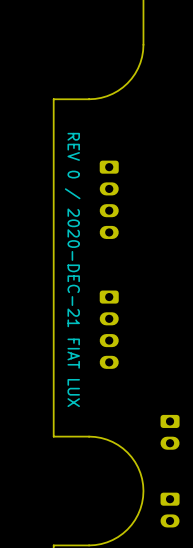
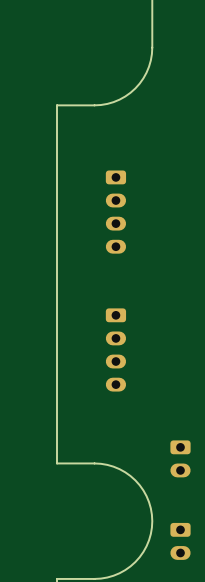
text: REV 0 / 2020-DEC-21 FIAT LUX (72, 269) -> none

